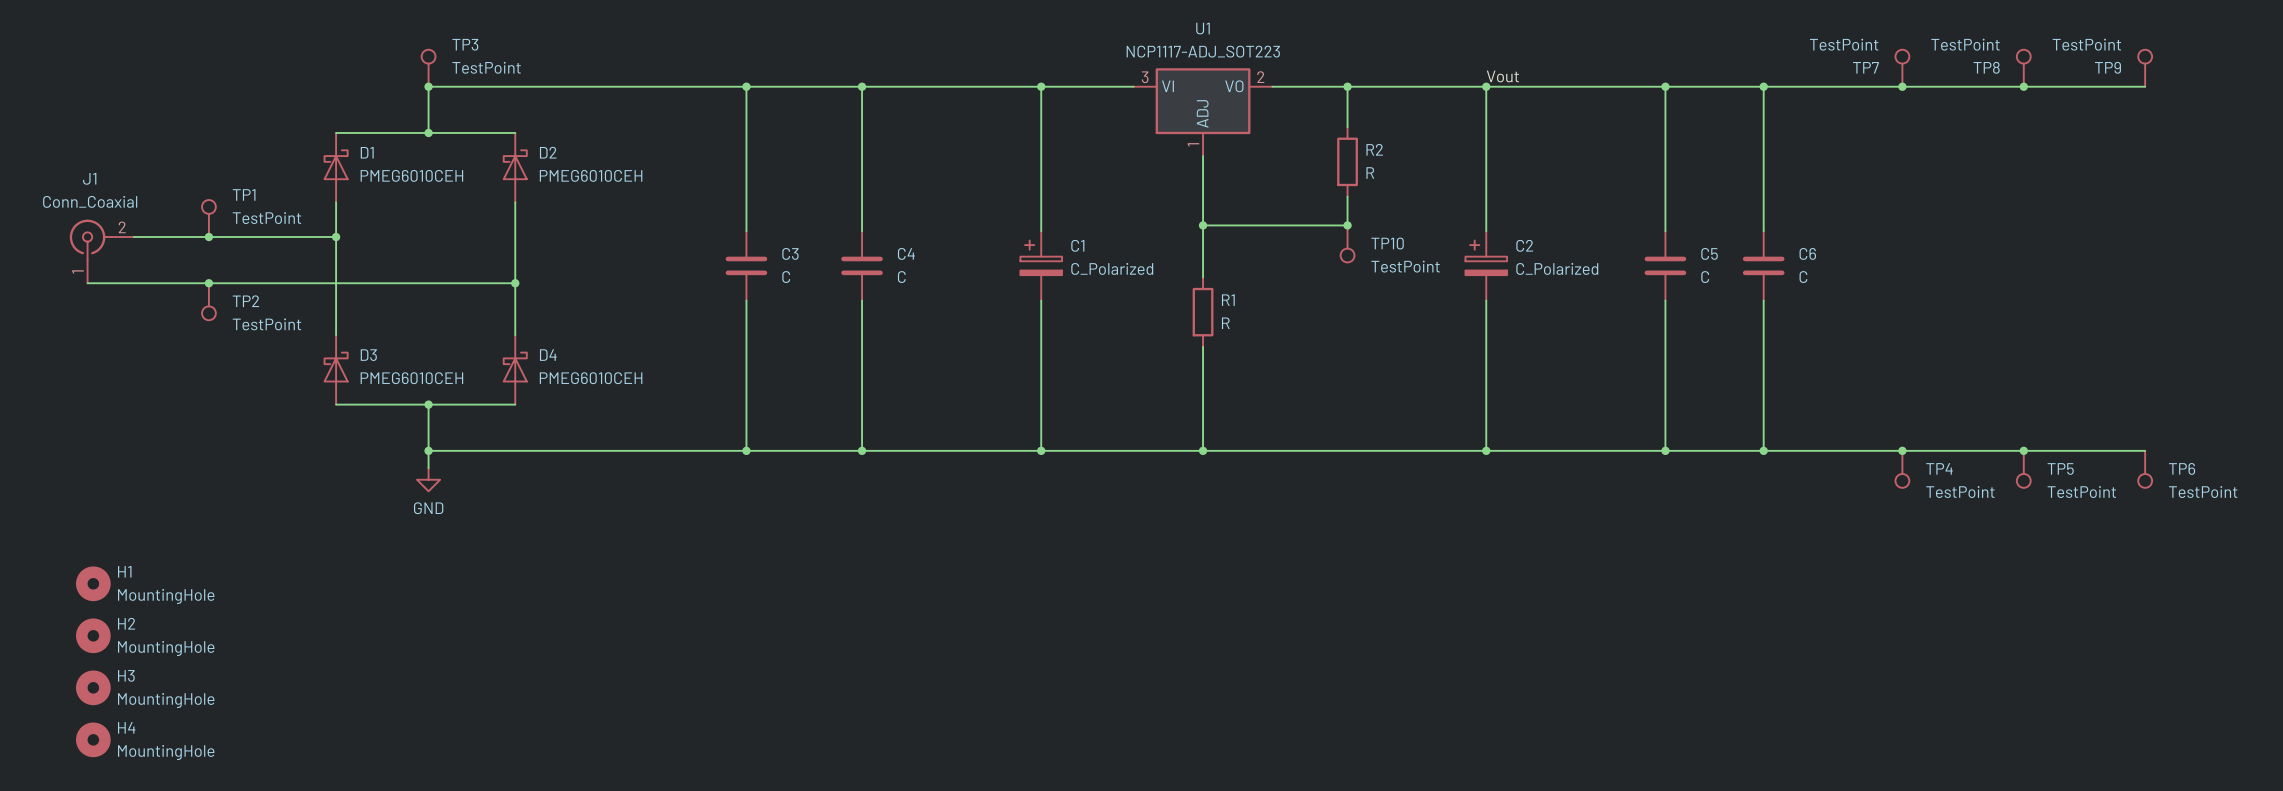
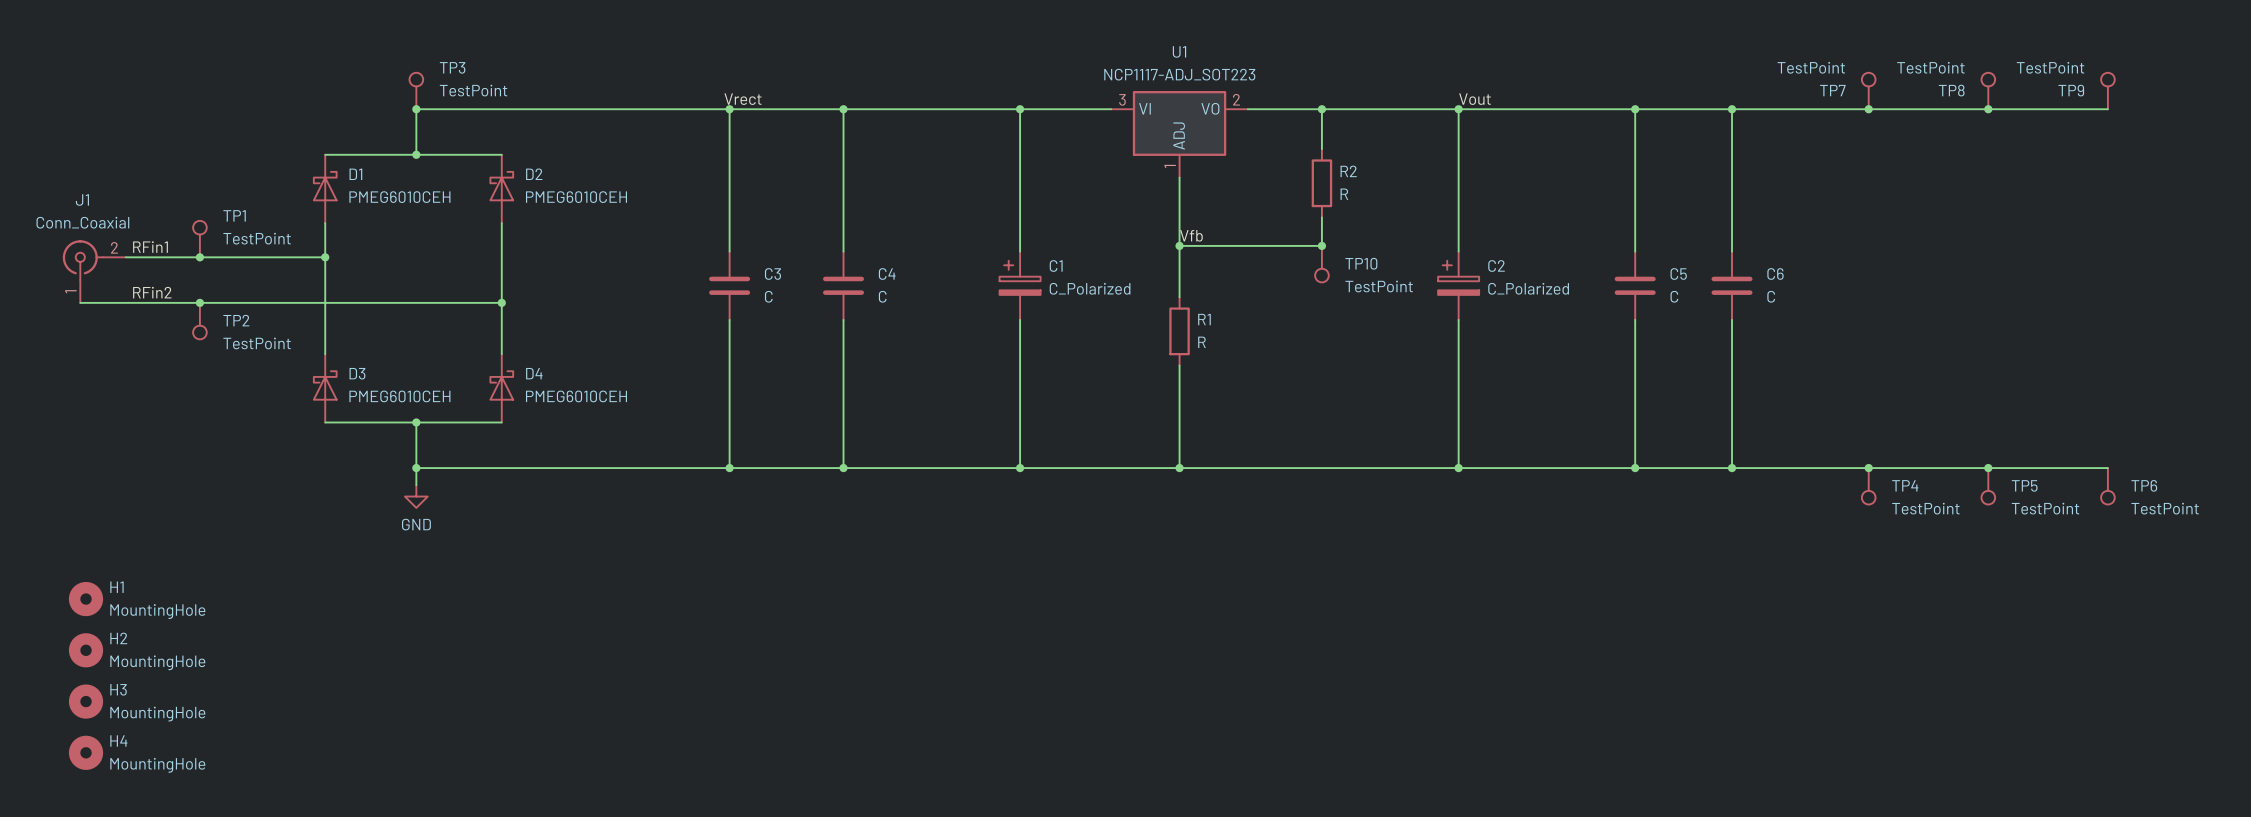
label: none -> Vrect (743, 99)
label: none -> Vfb (1191, 235)
label: none -> RFin1 (150, 247)
label: none -> RFin2 (152, 292)

